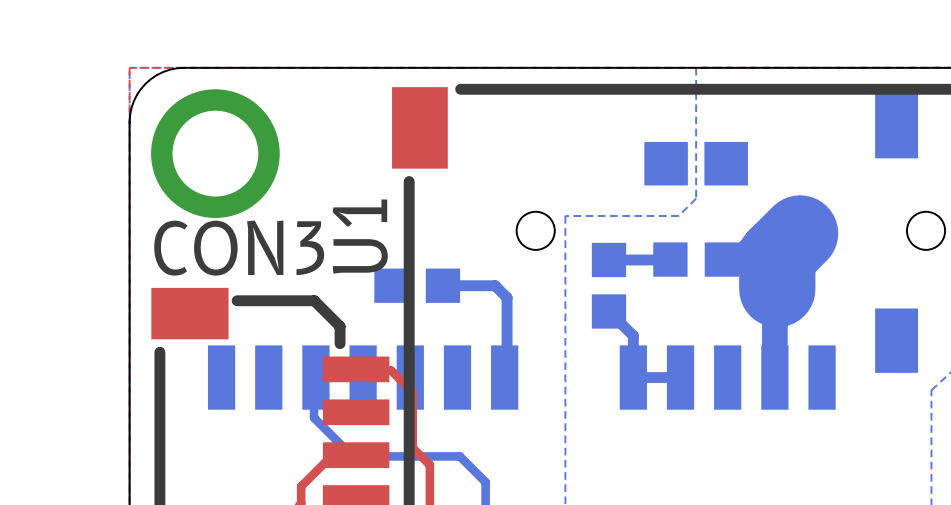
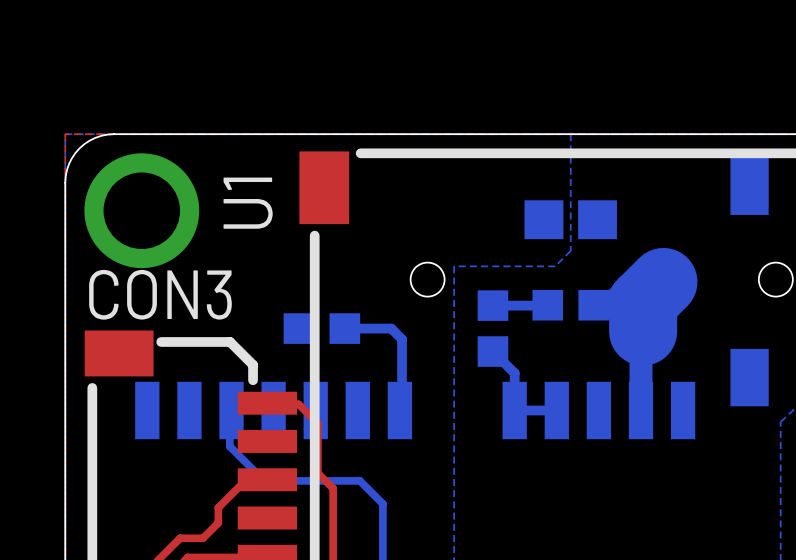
U1 name position: U1 (360, 236) -> U1 (248, 203)

